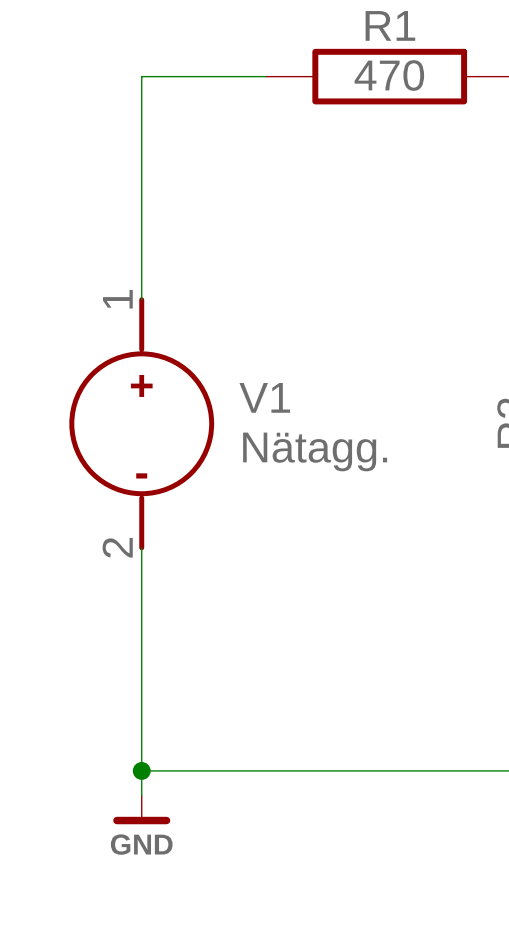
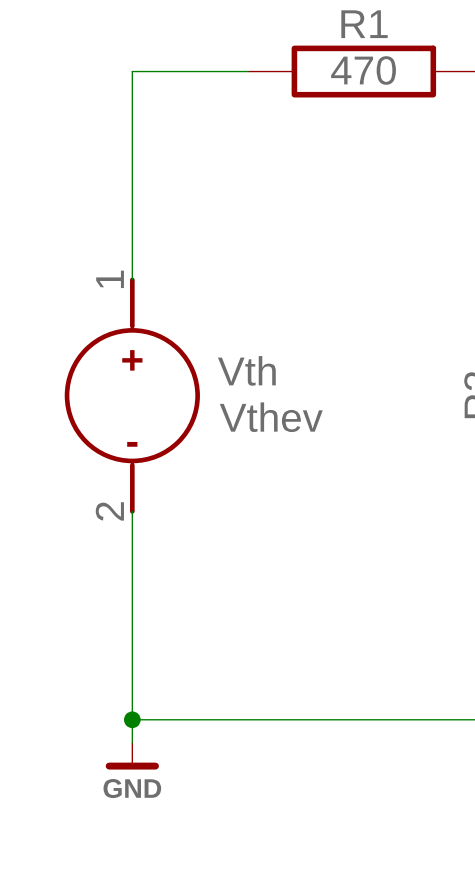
V1 name: V1 (264, 397) -> Vth (246, 370)
V1 value: Nätagg. (315, 451) -> Vthev (271, 417)

